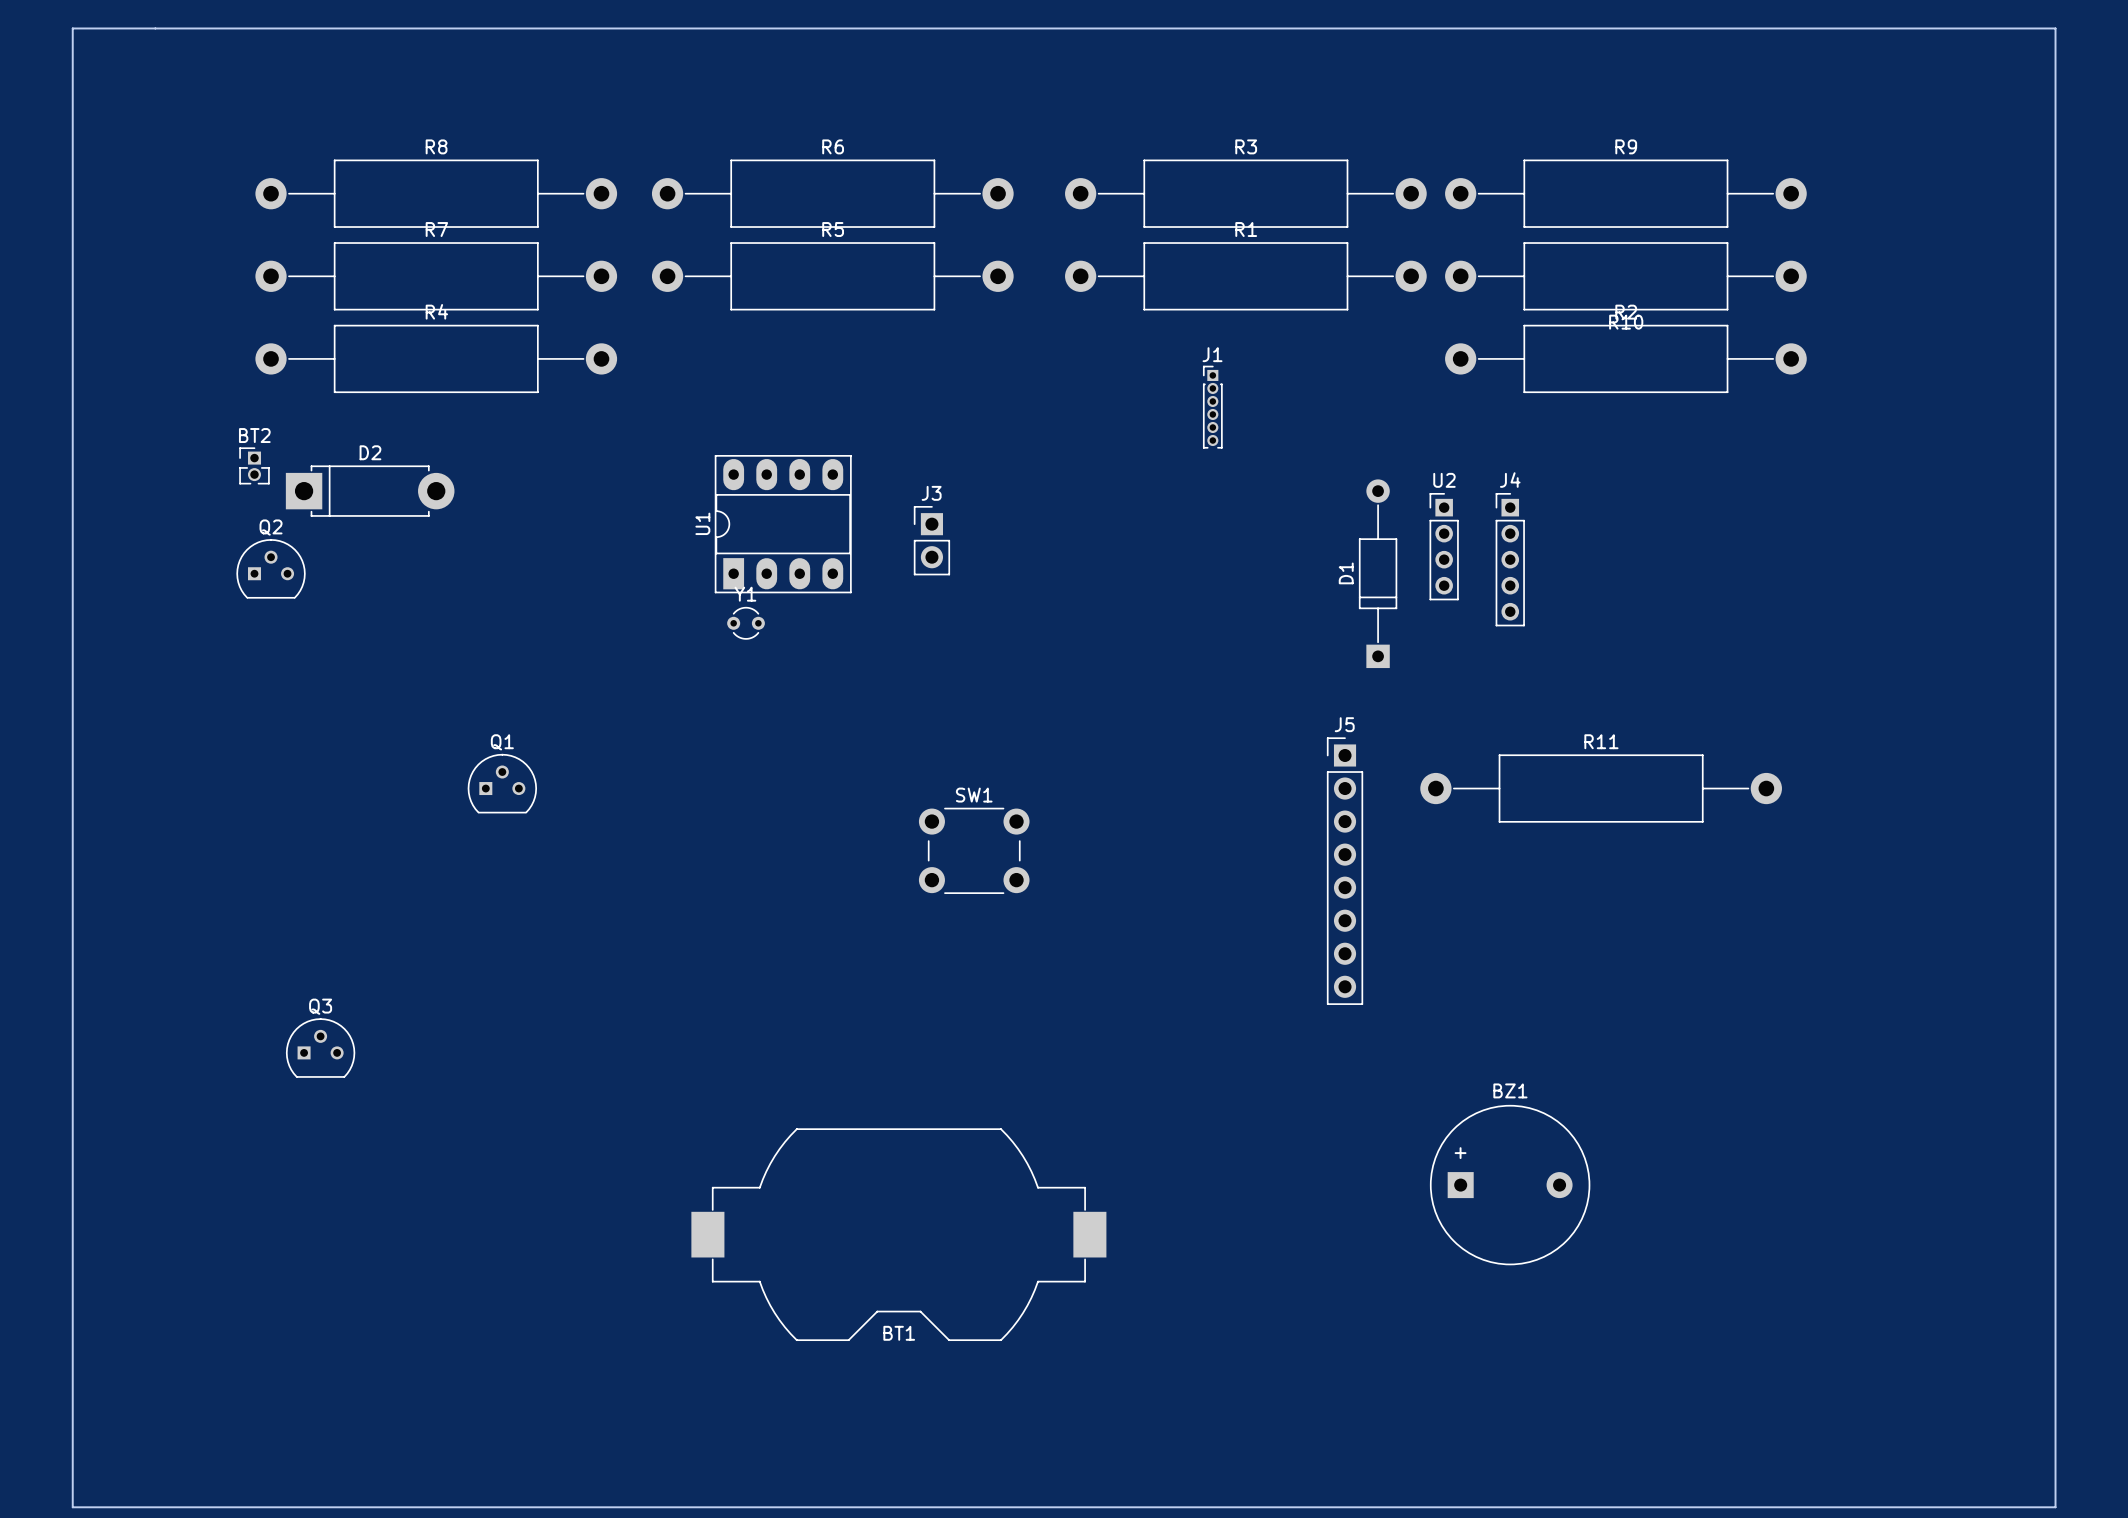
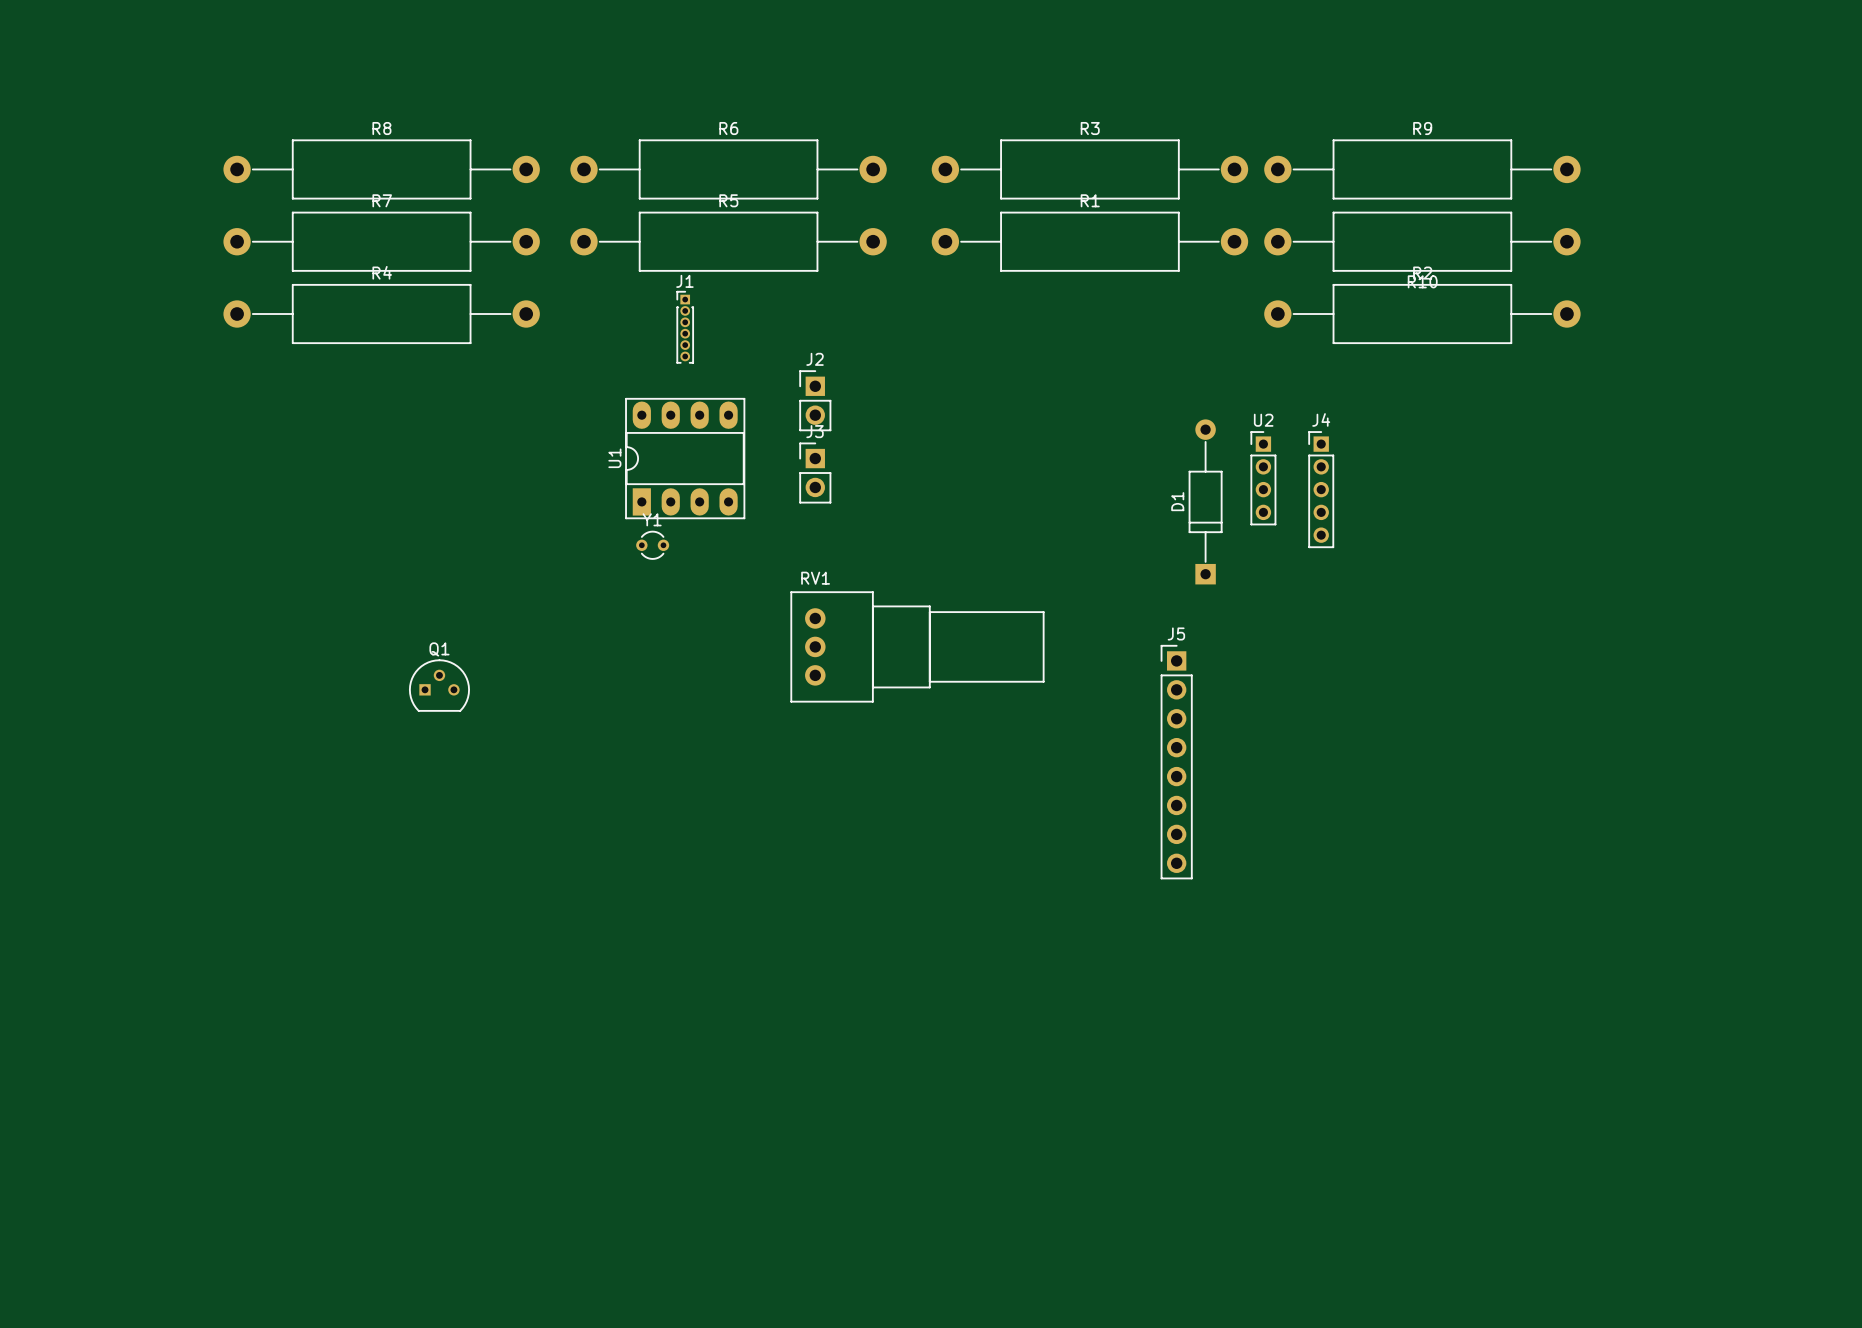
board edge: (72, 28) (2055, 28) (2055, 1507) (72, 1507) (72, 28) -> none
J1 position: (1212, 407) -> (685, 327)
J2: none -> (815, 400)
BT2: (254, 465) -> none
D2: (370, 491) -> none
Q2: (271, 568) -> none
RV1: none -> (917, 646)
R11: (1601, 788) -> none
SW1: (974, 850) -> none
Q3: (320, 1048) -> none
BZ1: (1510, 1185) -> none
BT1: (898, 1234) -> none

